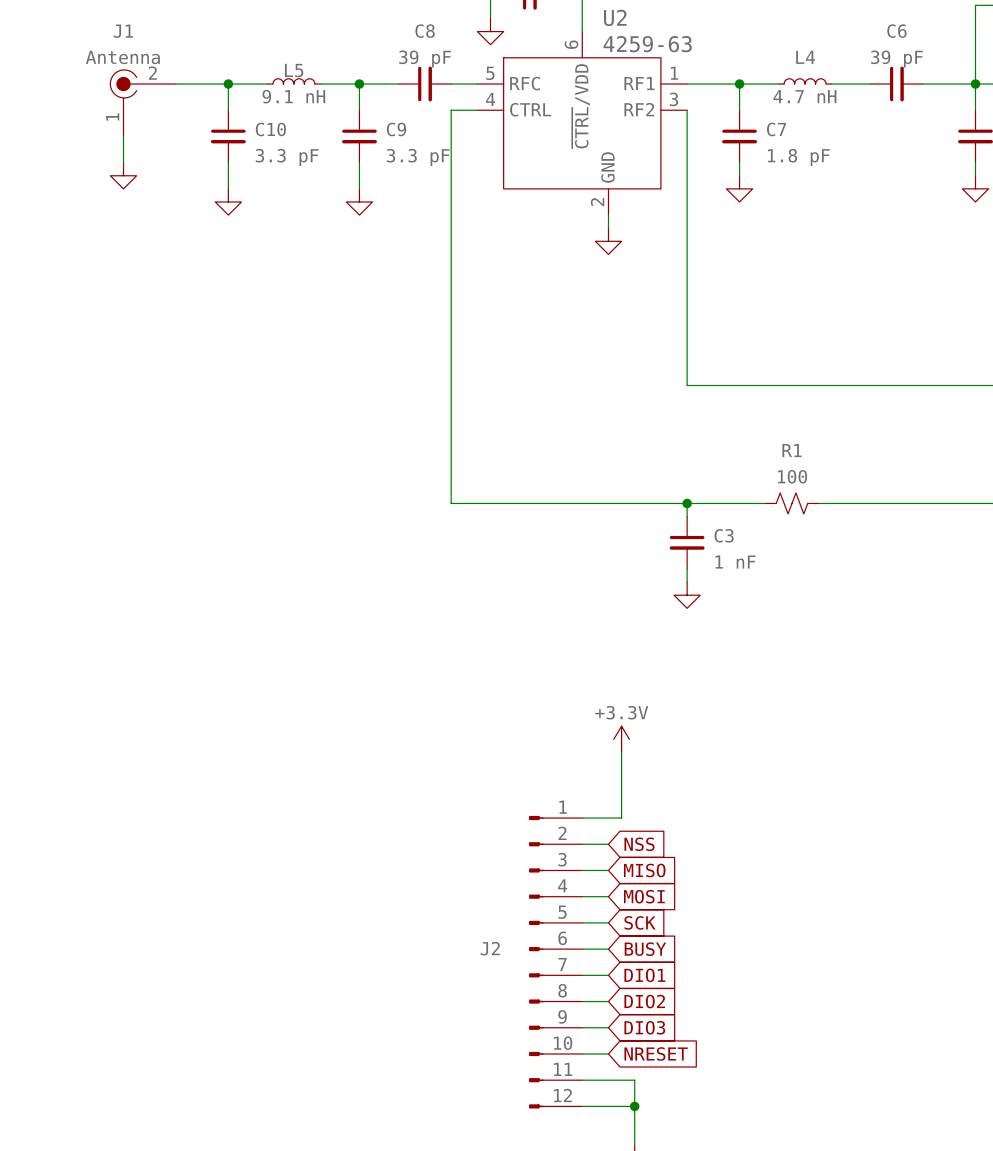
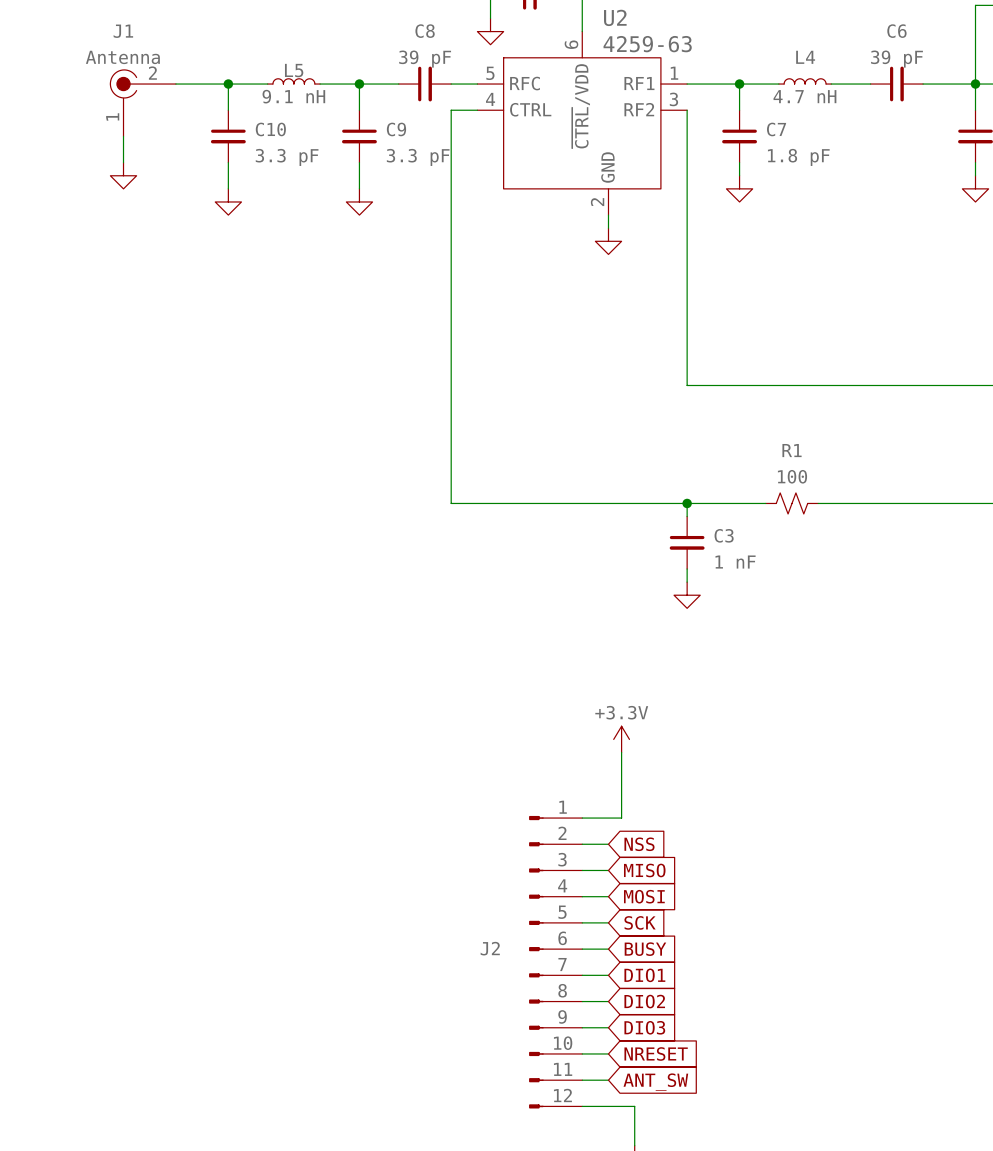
wire: (608, 1080) (634, 1080) (634, 1106) -> none
global label: none -> ANT_SW (655, 1082)
junction: (634, 1106) -> none

